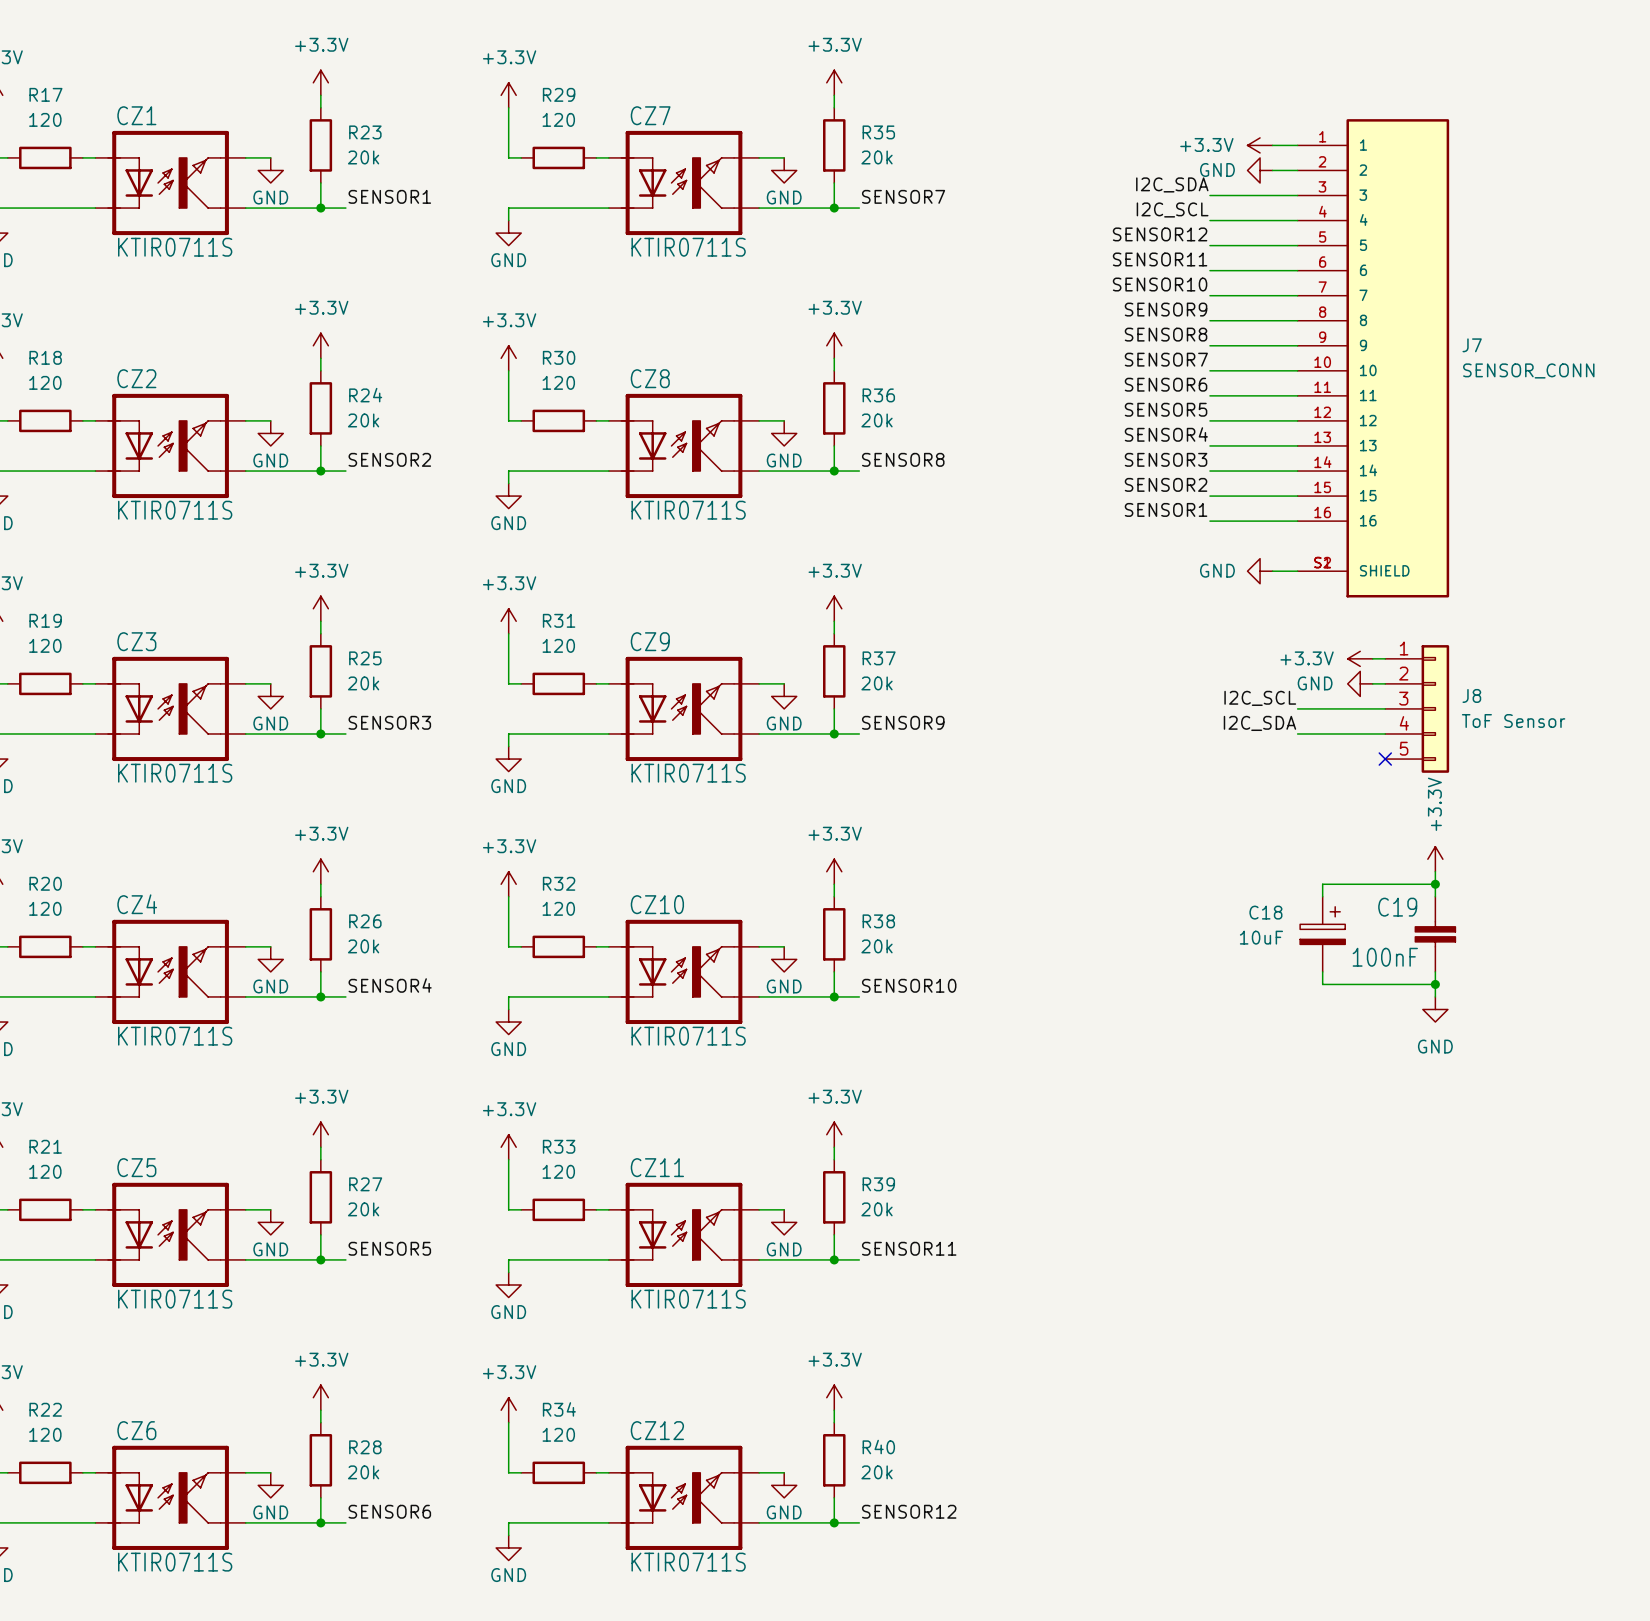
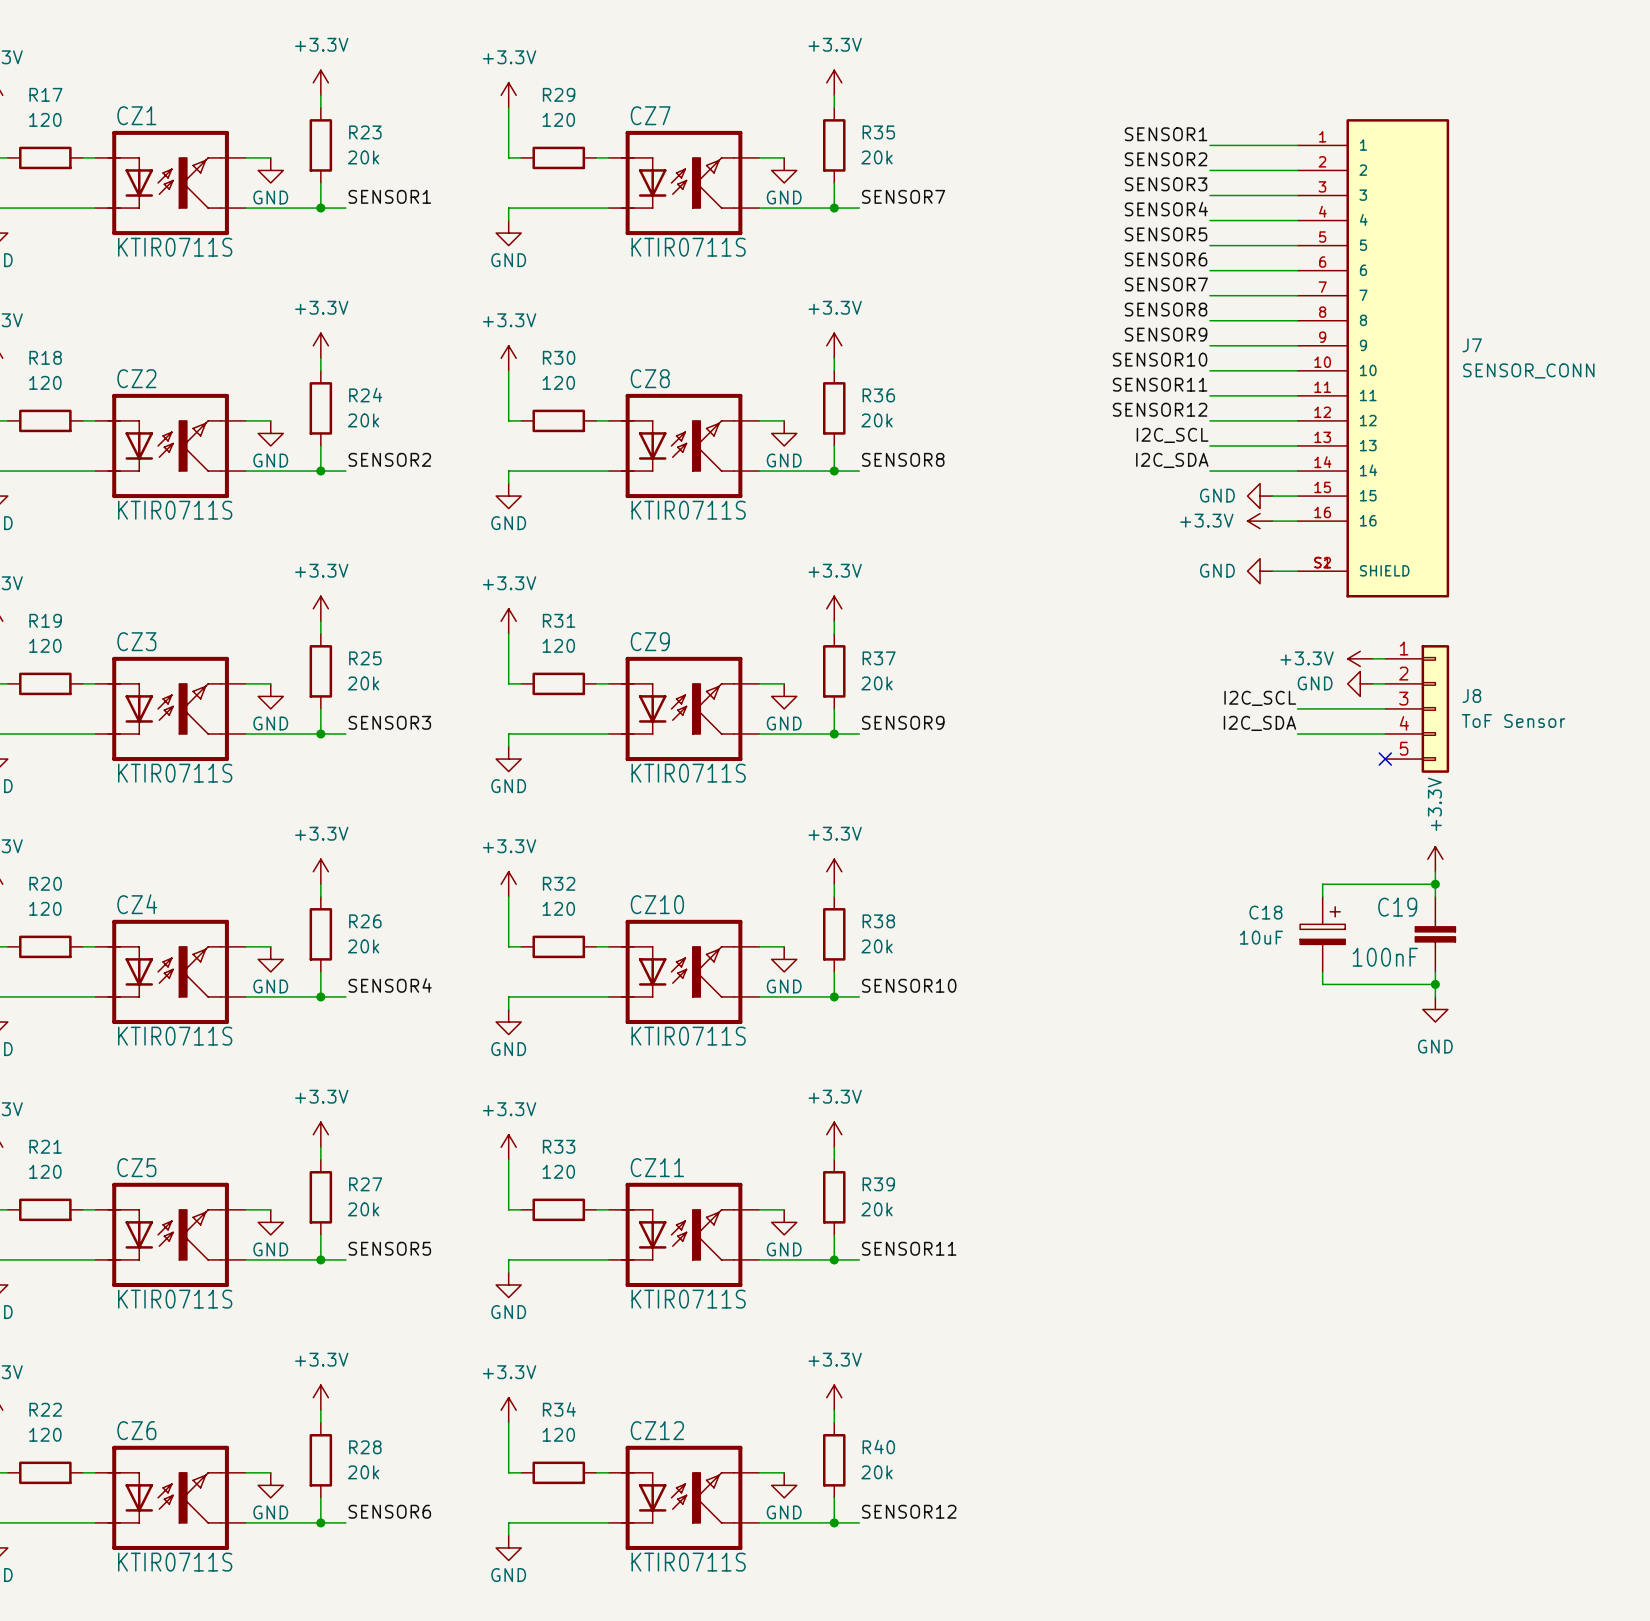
label: none -> SENSOR1 (1166, 134)
wire: none -> (1209, 145) (1272, 145)
power symbol: +3.3V (1260, 145) -> none
label: none -> SENSOR2 (1166, 159)
wire: none -> (1209, 170) (1272, 170)
power symbol: GND (1260, 170) -> none
label: I2C_SDA (1172, 184) -> SENSOR3 (1166, 184)
label: I2C_SCL (1172, 209) -> SENSOR4 (1166, 209)
label: SENSOR12 (1160, 234) -> SENSOR5 (1166, 234)
label: SENSOR11 (1160, 259) -> SENSOR6 (1166, 259)
label: SENSOR10 (1160, 284) -> SENSOR7 (1166, 284)
label: SENSOR9 (1166, 309) -> SENSOR8 (1166, 309)
label: SENSOR8 (1166, 334) -> SENSOR9 (1166, 334)
label: SENSOR7 (1166, 359) -> SENSOR10 (1160, 359)
label: SENSOR6 (1166, 384) -> SENSOR11 (1160, 384)
label: SENSOR5 (1166, 409) -> SENSOR12 (1160, 409)
label: SENSOR4 (1166, 434) -> I2C_SCL (1172, 435)
label: SENSOR3 (1166, 459) -> I2C_SDA (1172, 460)
label: SENSOR2 (1166, 484) -> none
wire: (1209, 496) (1272, 496) -> none
power symbol: none -> GND (1260, 496)
label: SENSOR1 (1166, 509) -> none
wire: (1209, 521) (1272, 521) -> none
power symbol: none -> +3.3V (1260, 521)

